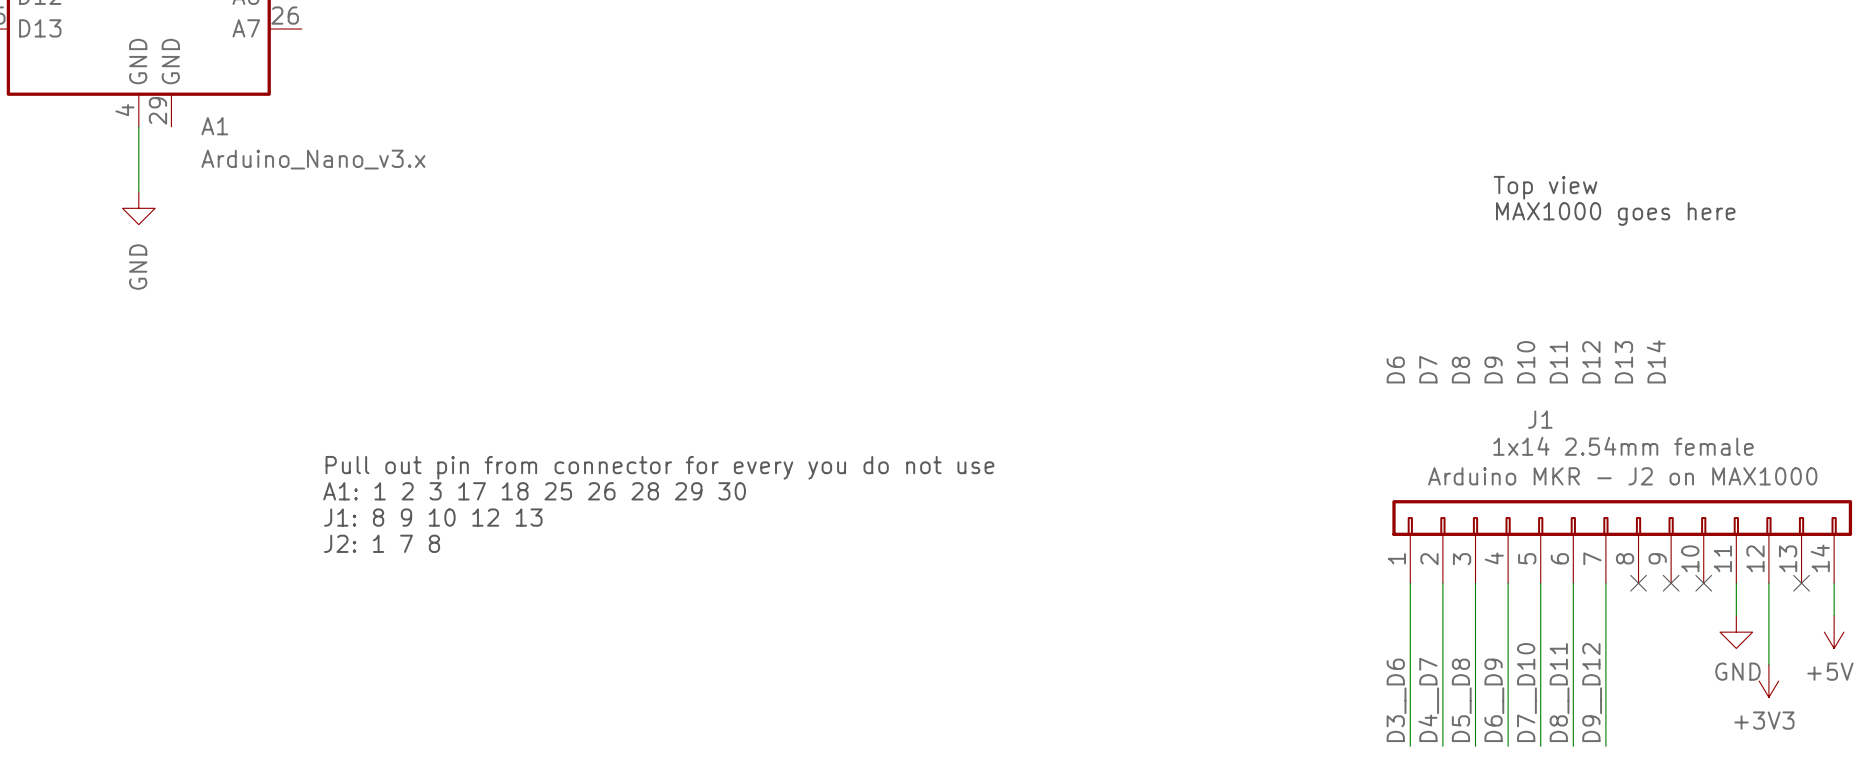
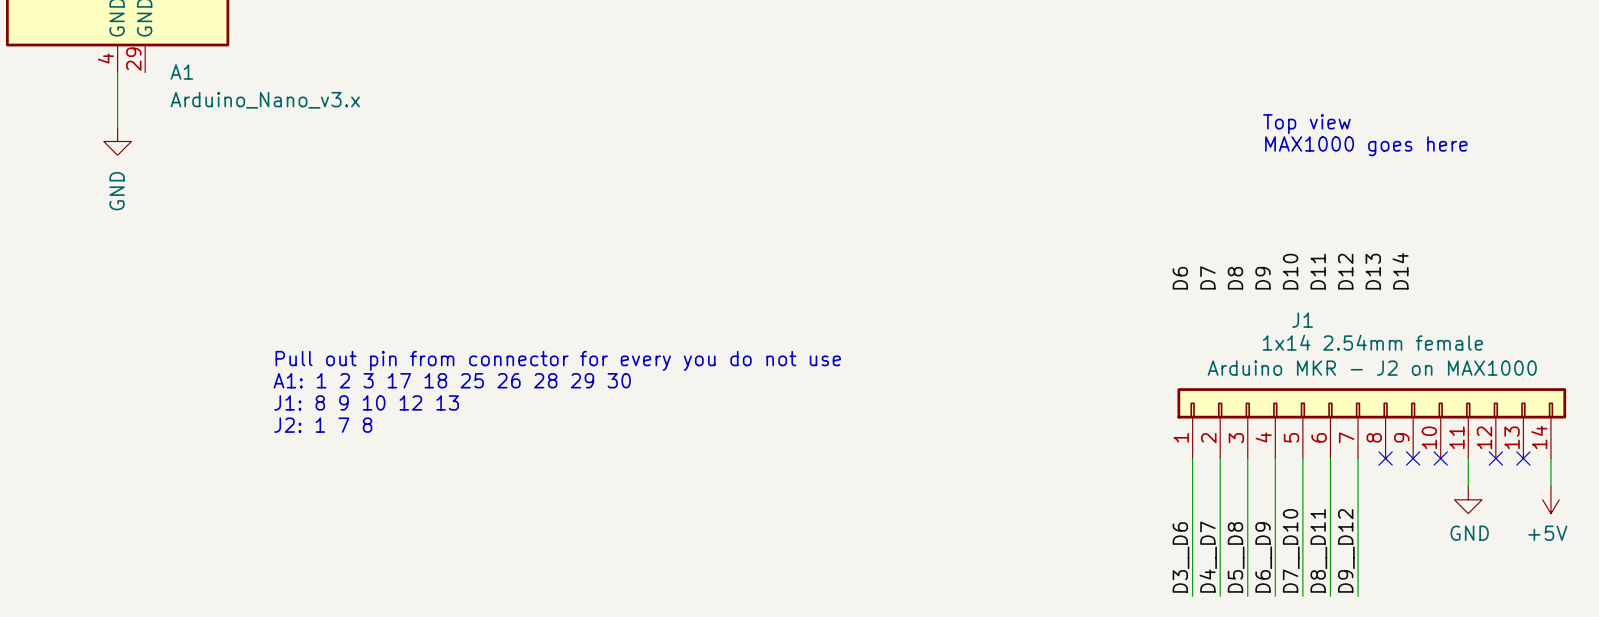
wire: (1768, 583) (1768, 664) -> none
no-connect mark: none -> (1495, 458)
power symbol: +3V3 (1768, 681) -> none

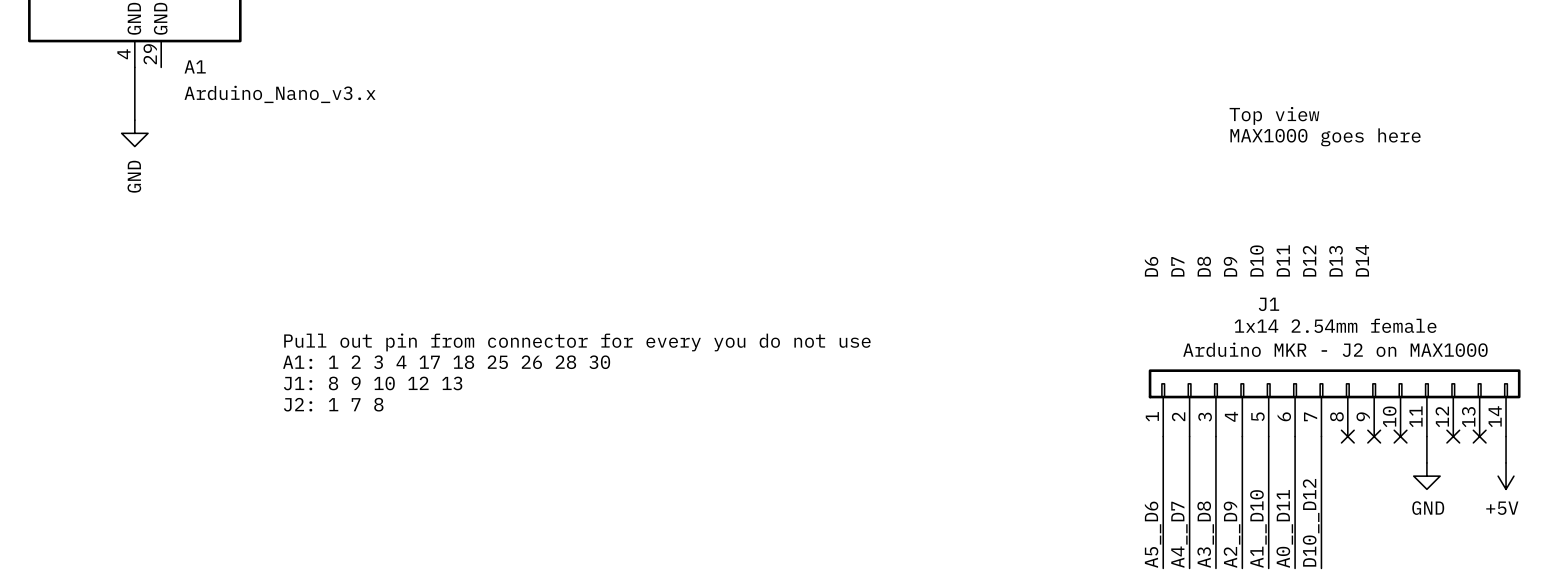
text: A1: 1 2 3 17 18 25 26 28 29 30 (452, 380) -> A1: 1 2 3 4 17 18 25 26 28 30 (446, 362)
label: D7__D10 (1291, 550) -> A1__D10 (1258, 529)
label: D8__D11 (1318, 550) -> A0__D11 (1284, 528)
label: D9__D12 (1346, 550) -> D10__D12 (1311, 522)
label: D3__D6 (1180, 557) -> A5__D6 (1153, 534)
label: D4__D7 (1208, 557) -> A4__D7 (1179, 534)
label: D5__D8 (1236, 557) -> A3__D8 (1205, 534)
label: D6__D9 (1263, 557) -> A2__D9 (1232, 534)

